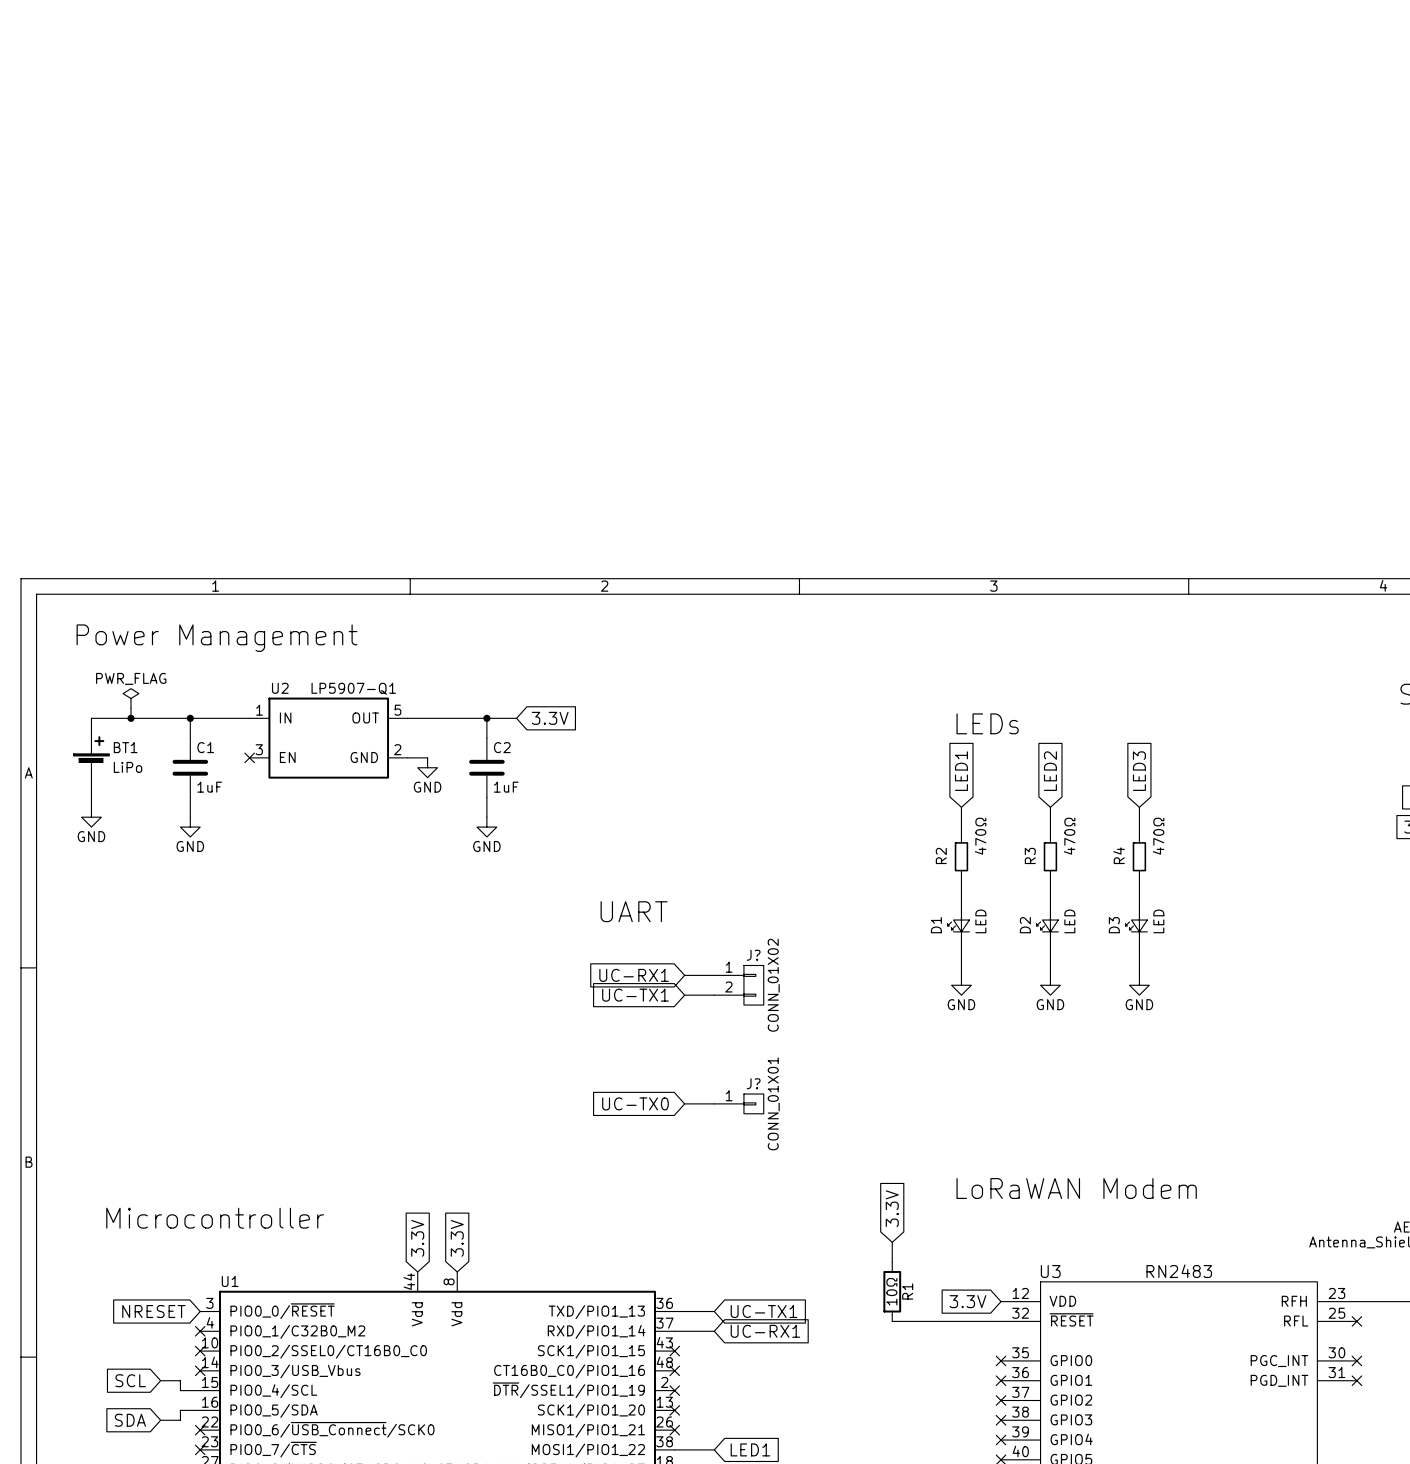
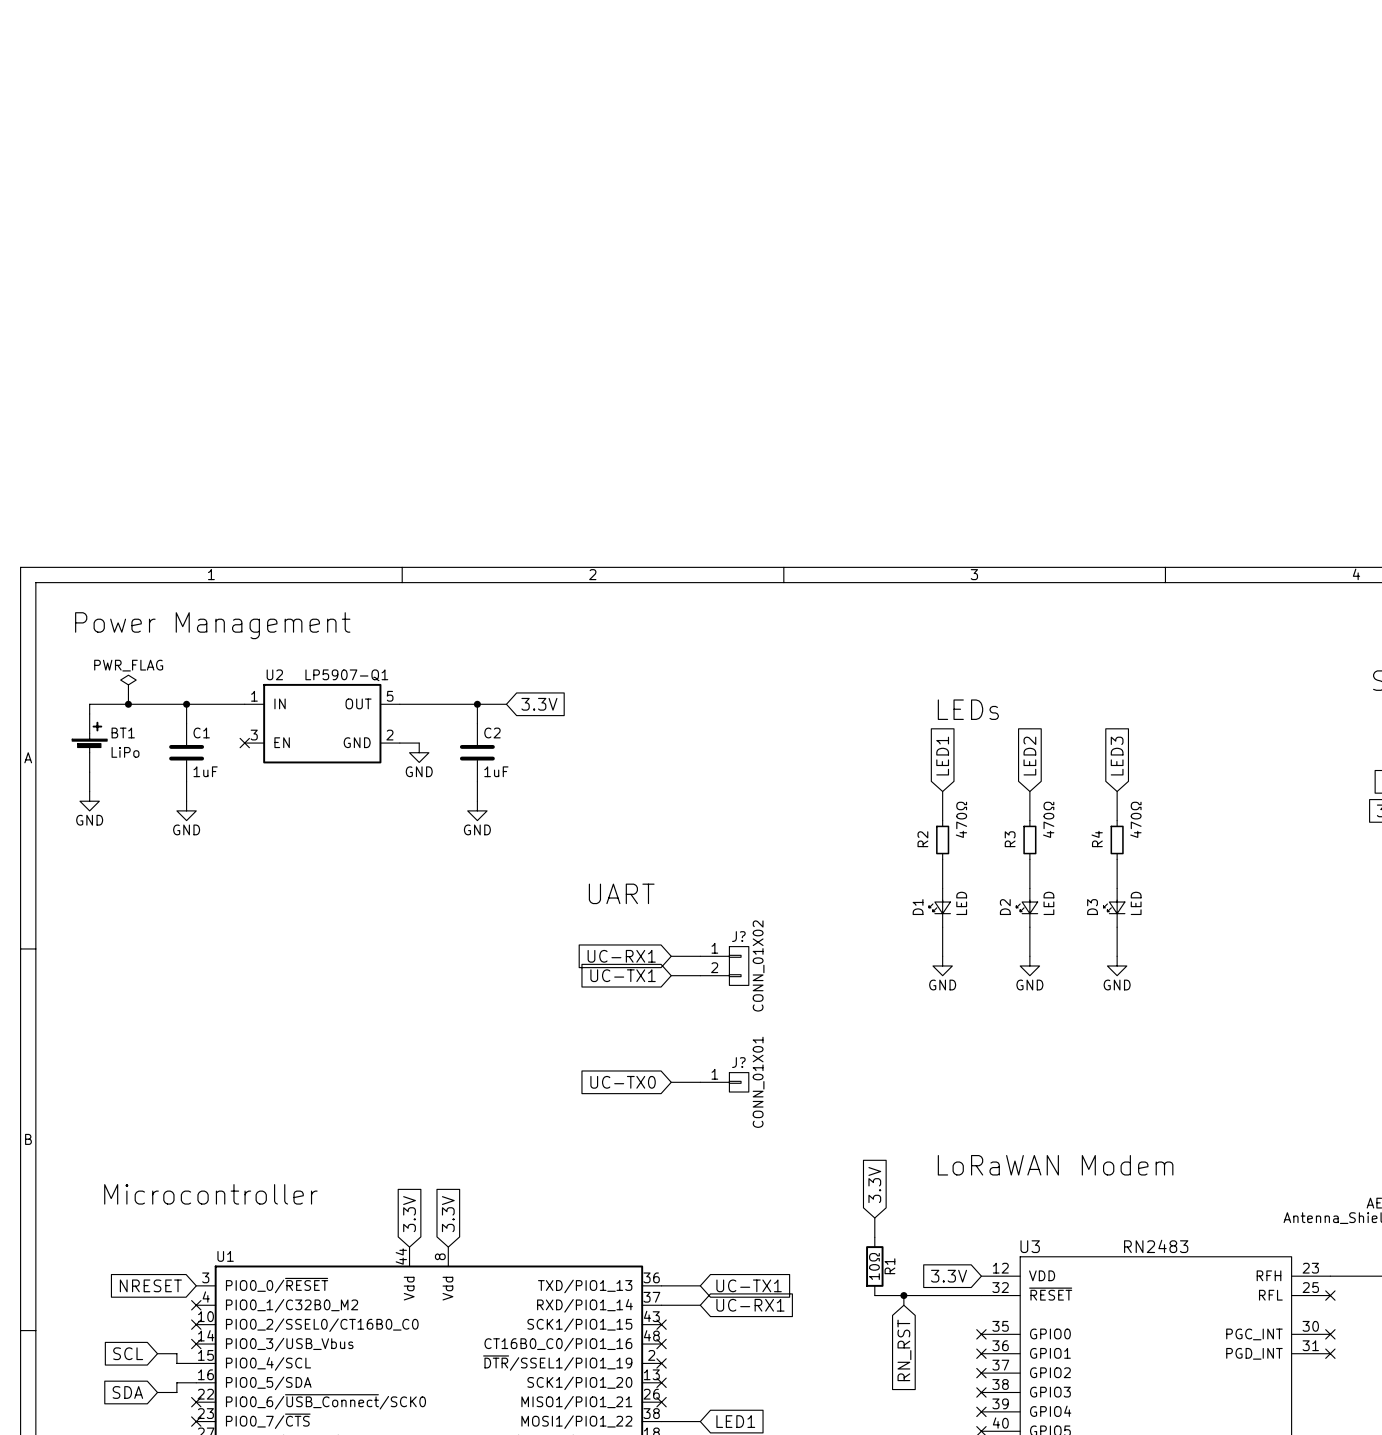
wire: none -> (903, 1295) (903, 1305)
junction: none -> (903, 1295)
global label: none -> RN_RST (904, 1350)

